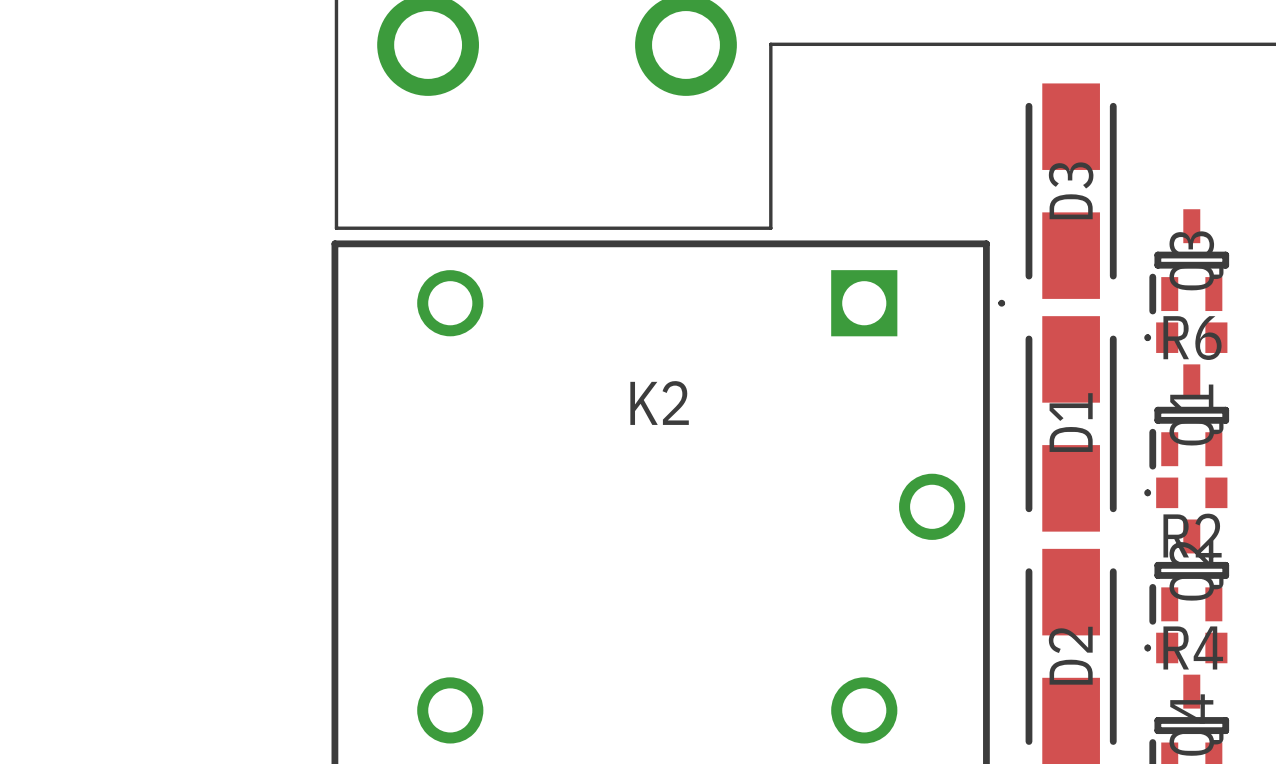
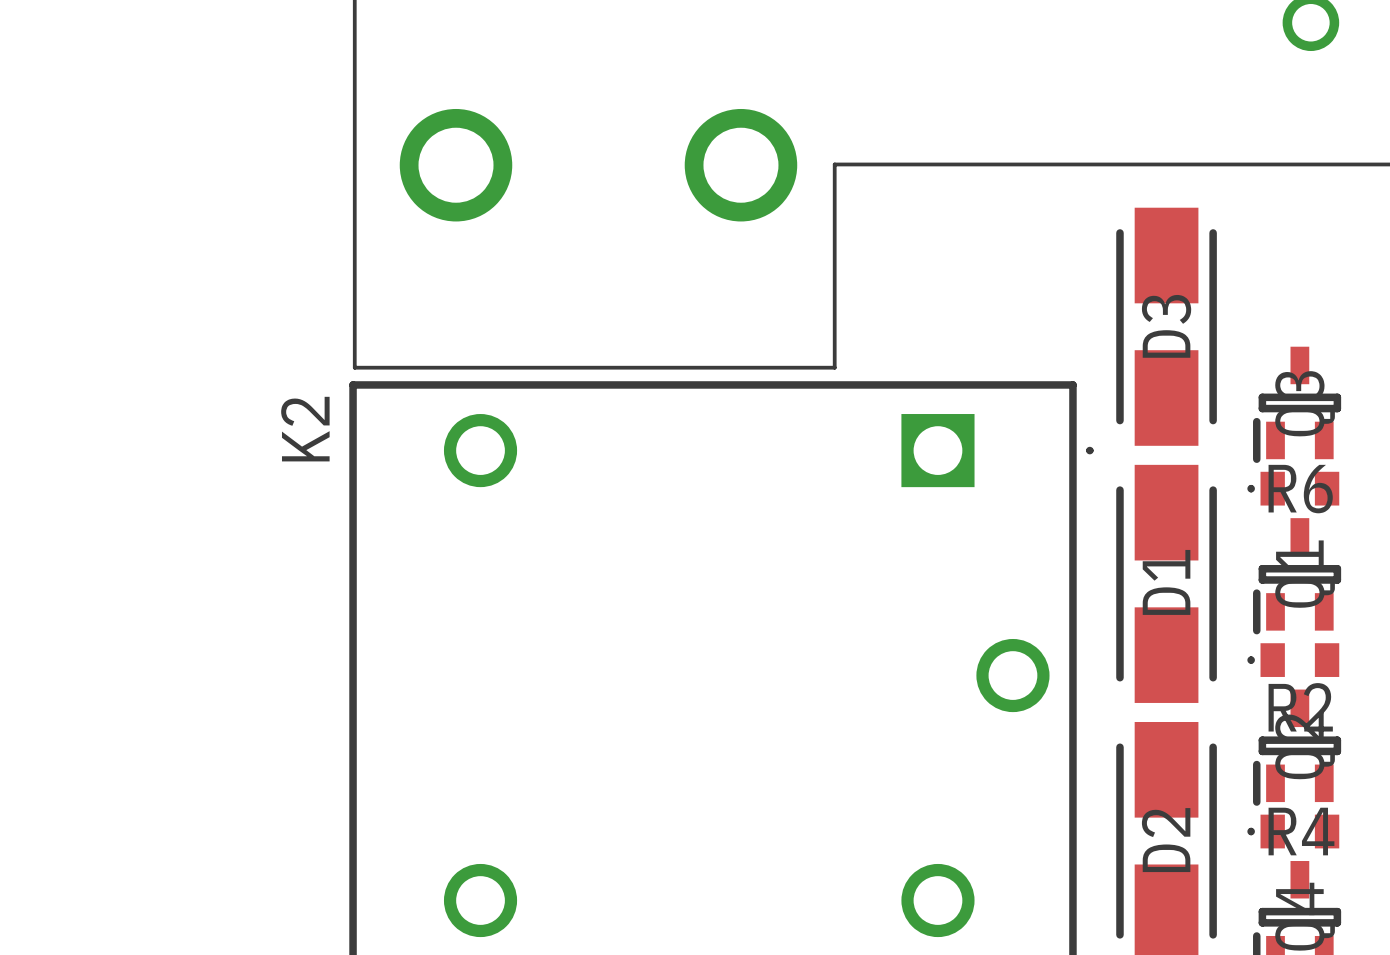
K2 name rotation: 0° (659, 403) -> 90° counterclockwise (305, 429)
K2 name position: K2 (659, 403) -> K2 (305, 429)

